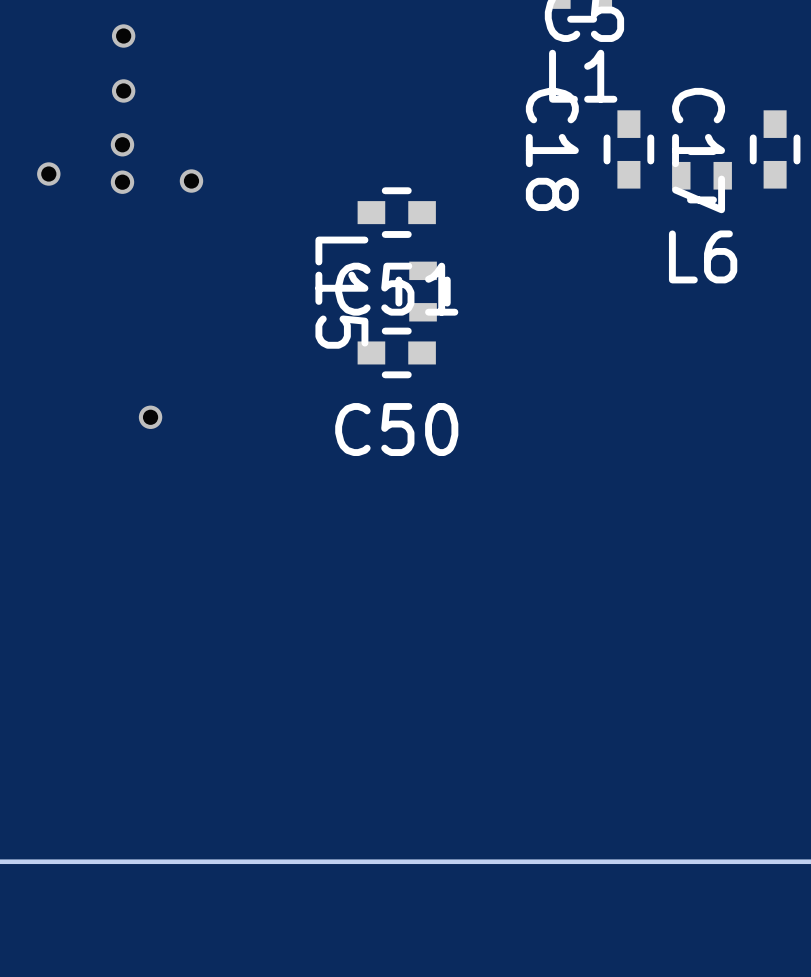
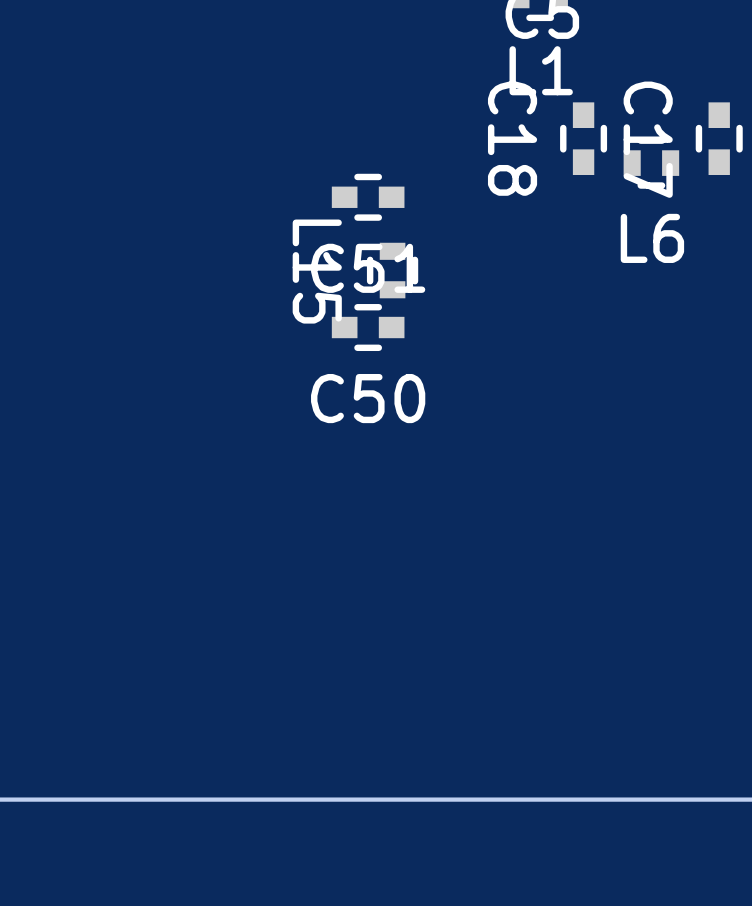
via: (123, 36) -> none
via: (123, 90) -> none
via: (122, 144) -> none
via: (48, 174) -> none
via: (191, 181) -> none
via: (122, 182) -> none
via: (150, 417) -> none

